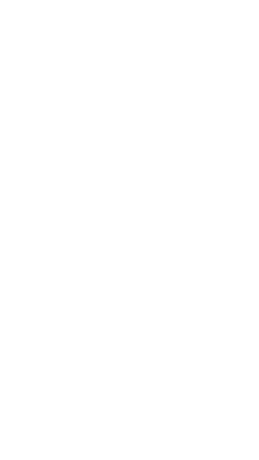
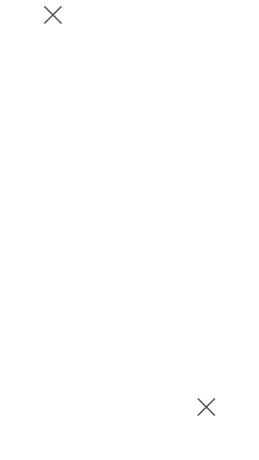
no-connect mark: none -> (52, 14)
no-connect mark: none -> (206, 407)

